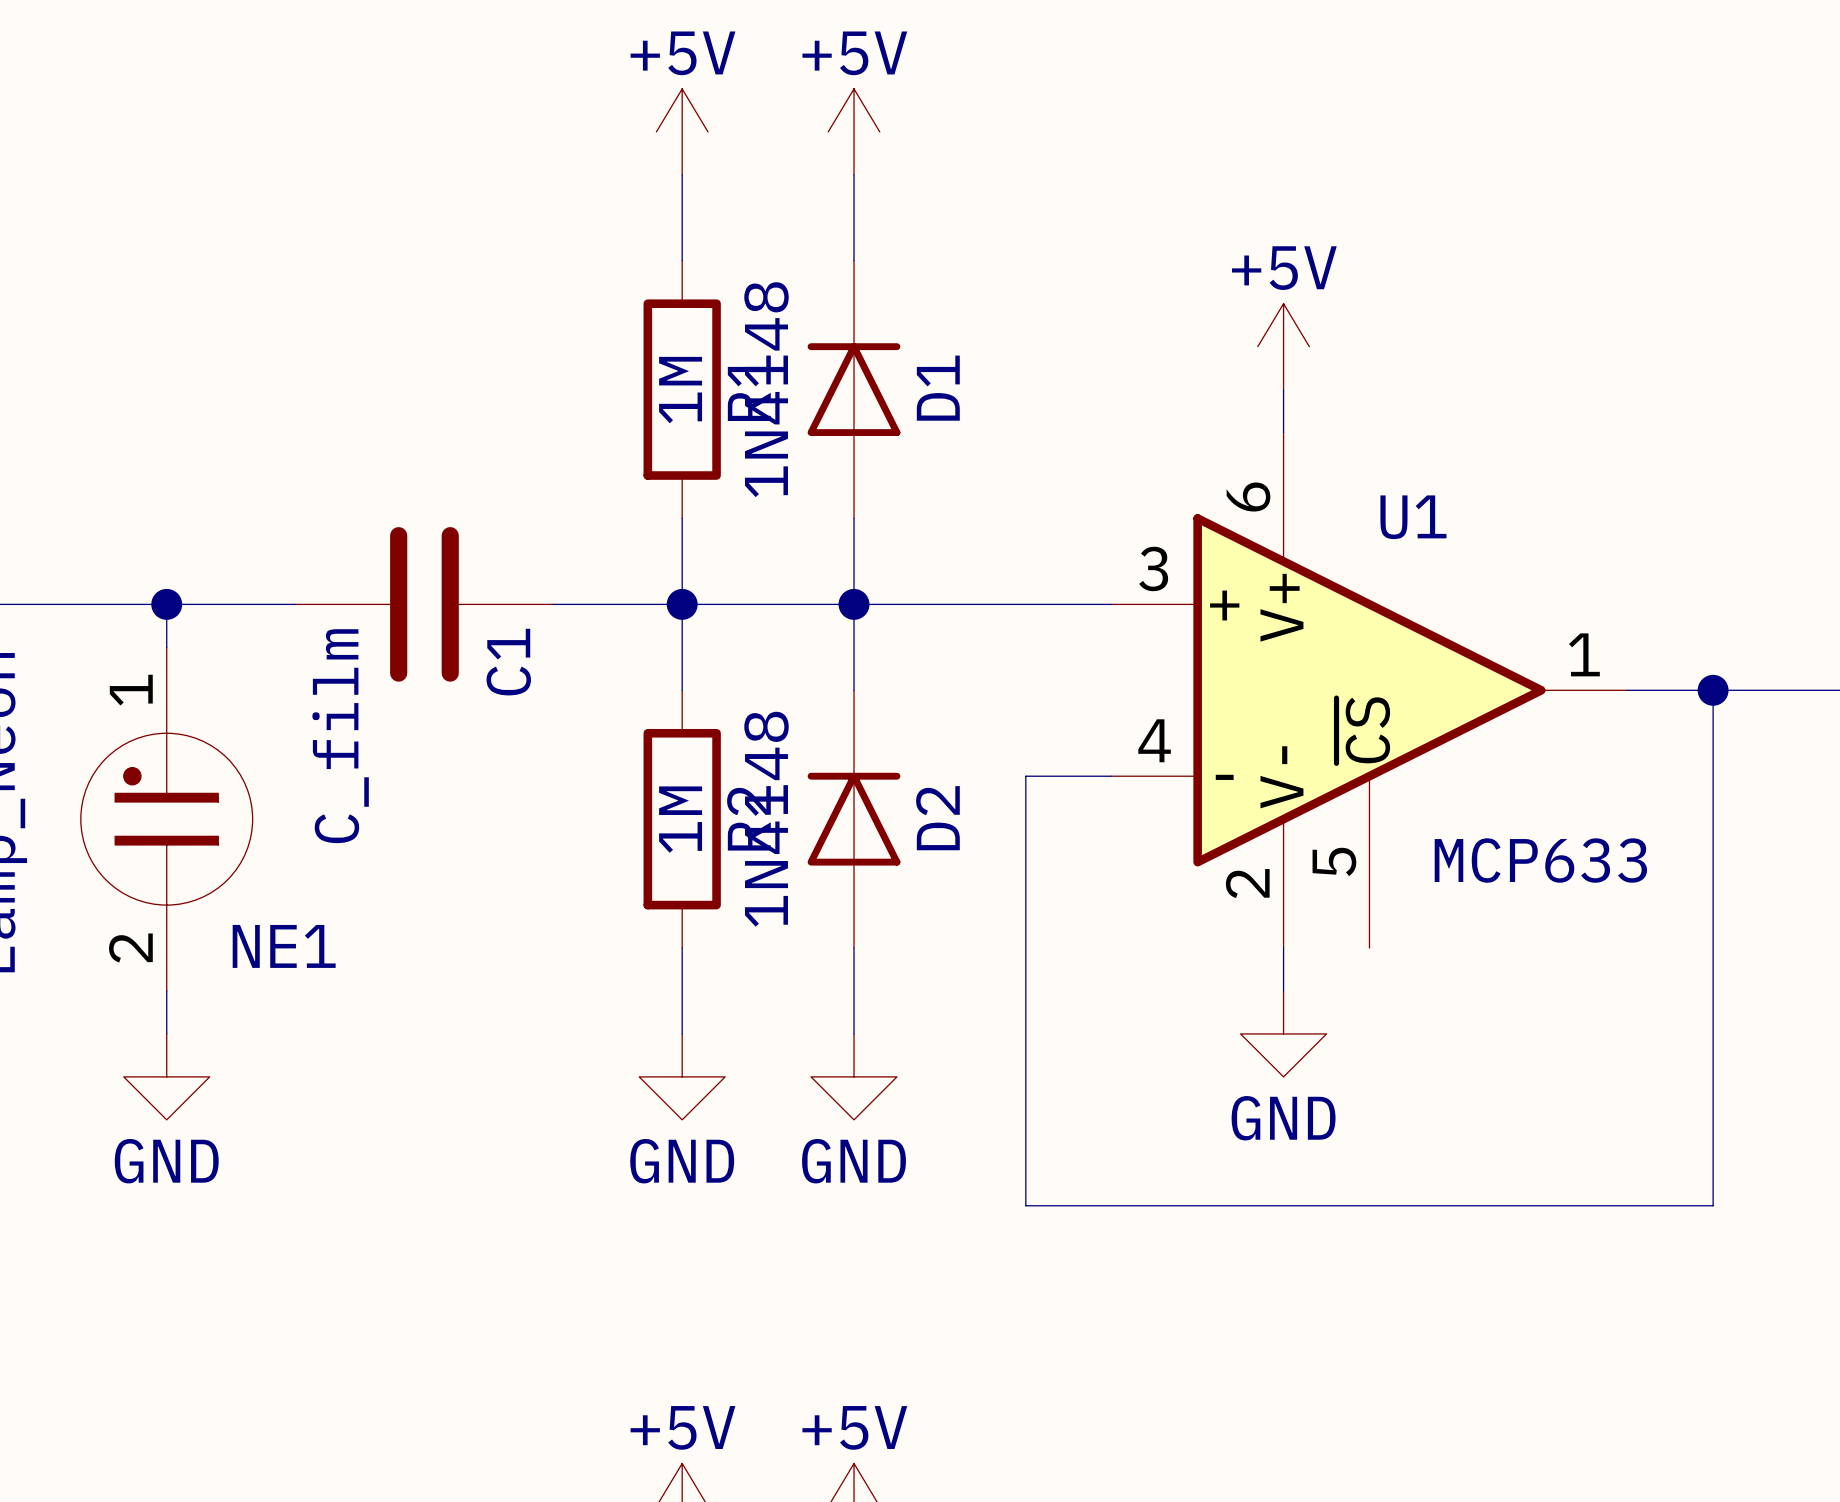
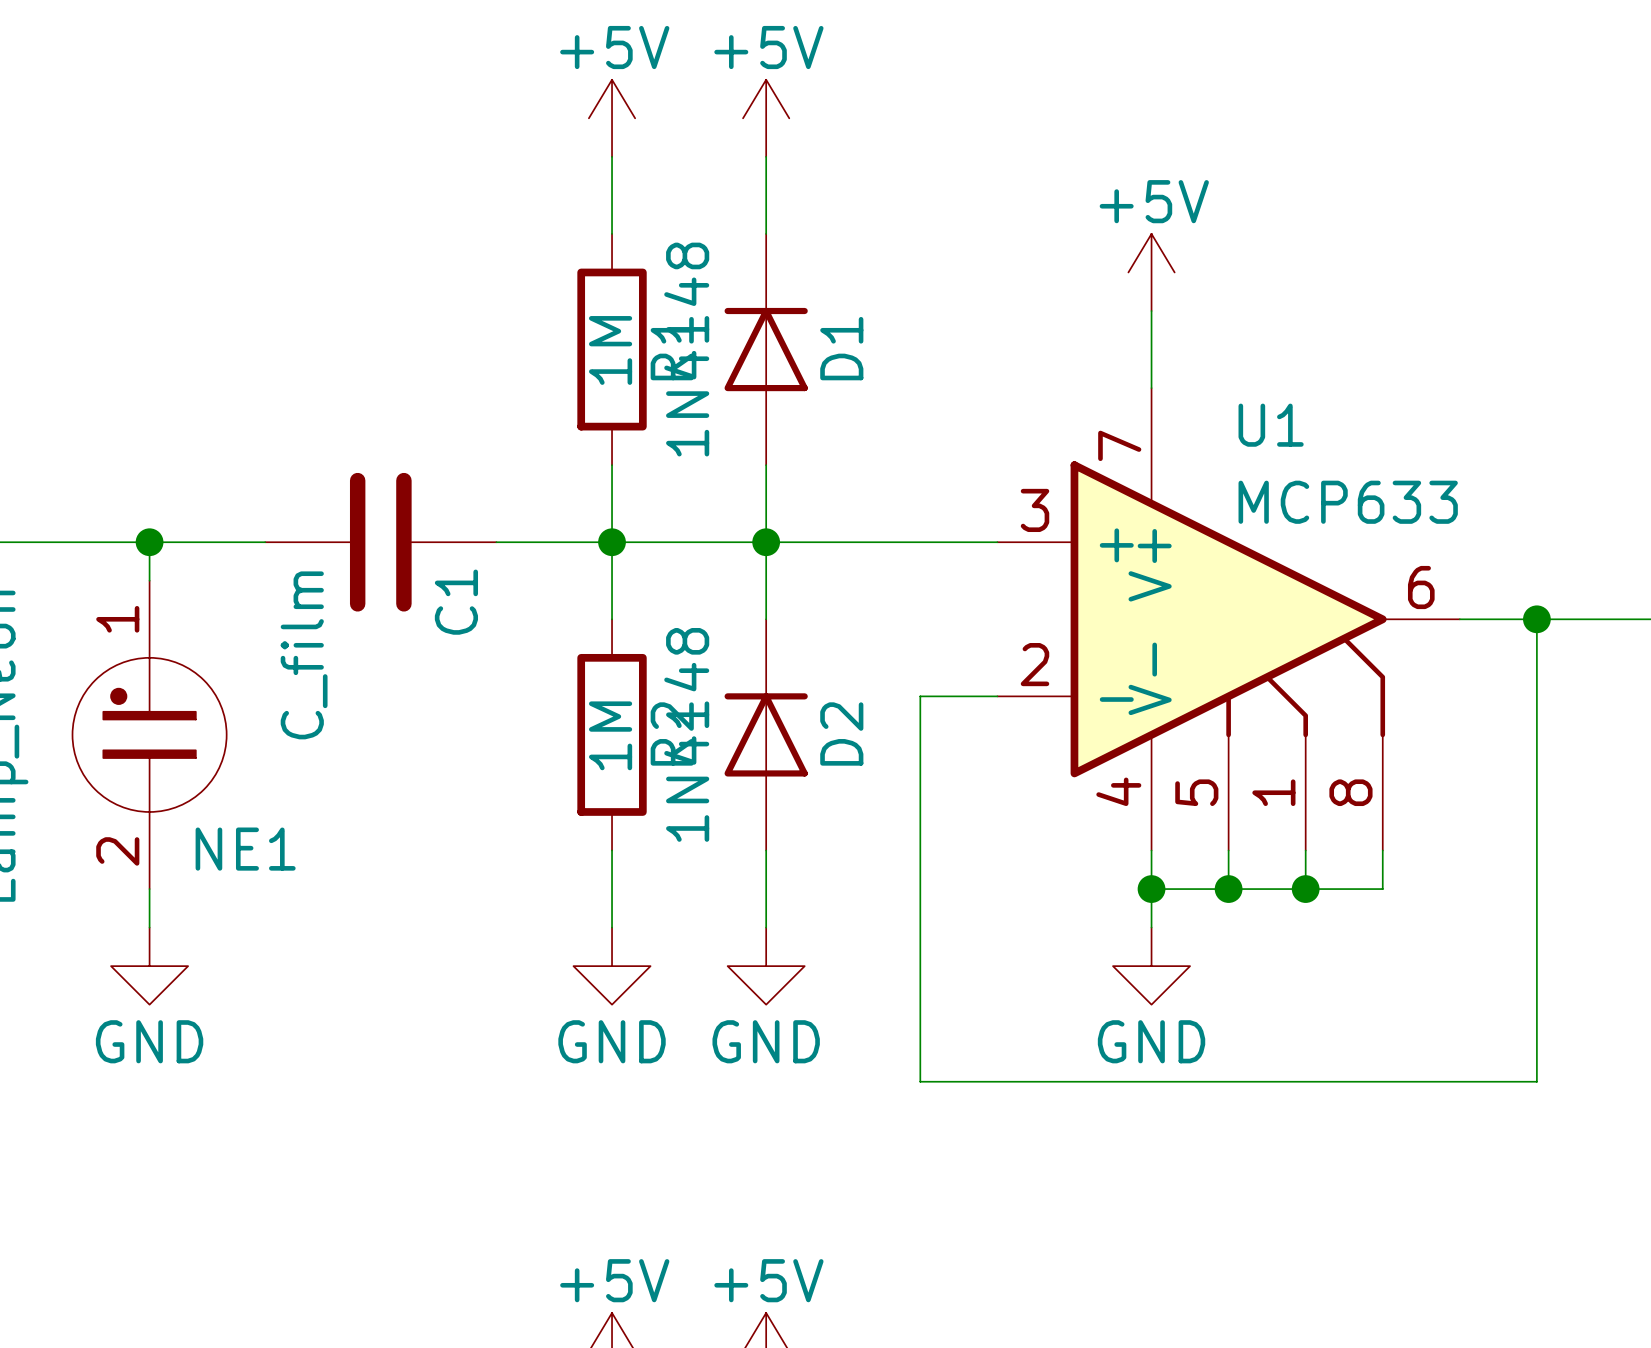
power symbol position: +5V (1283, 346) -> +5V (1151, 272)
U1 symbol: [1111, 432, 1628, 949] -> [997, 388, 1460, 851]
U1 value position: MCP633 (1540, 860) -> MCP633 (1348, 502)
wire: none -> (1228, 850) (1228, 889)
wire: none -> (1305, 850) (1305, 889)
wire: none -> (1382, 850) (1382, 889) (1151, 889) (1151, 927)
junction: none -> (1151, 889)
junction: none -> (1228, 889)
junction: none -> (1305, 889)
power symbol position: GND (1283, 1033) -> GND (1151, 966)

